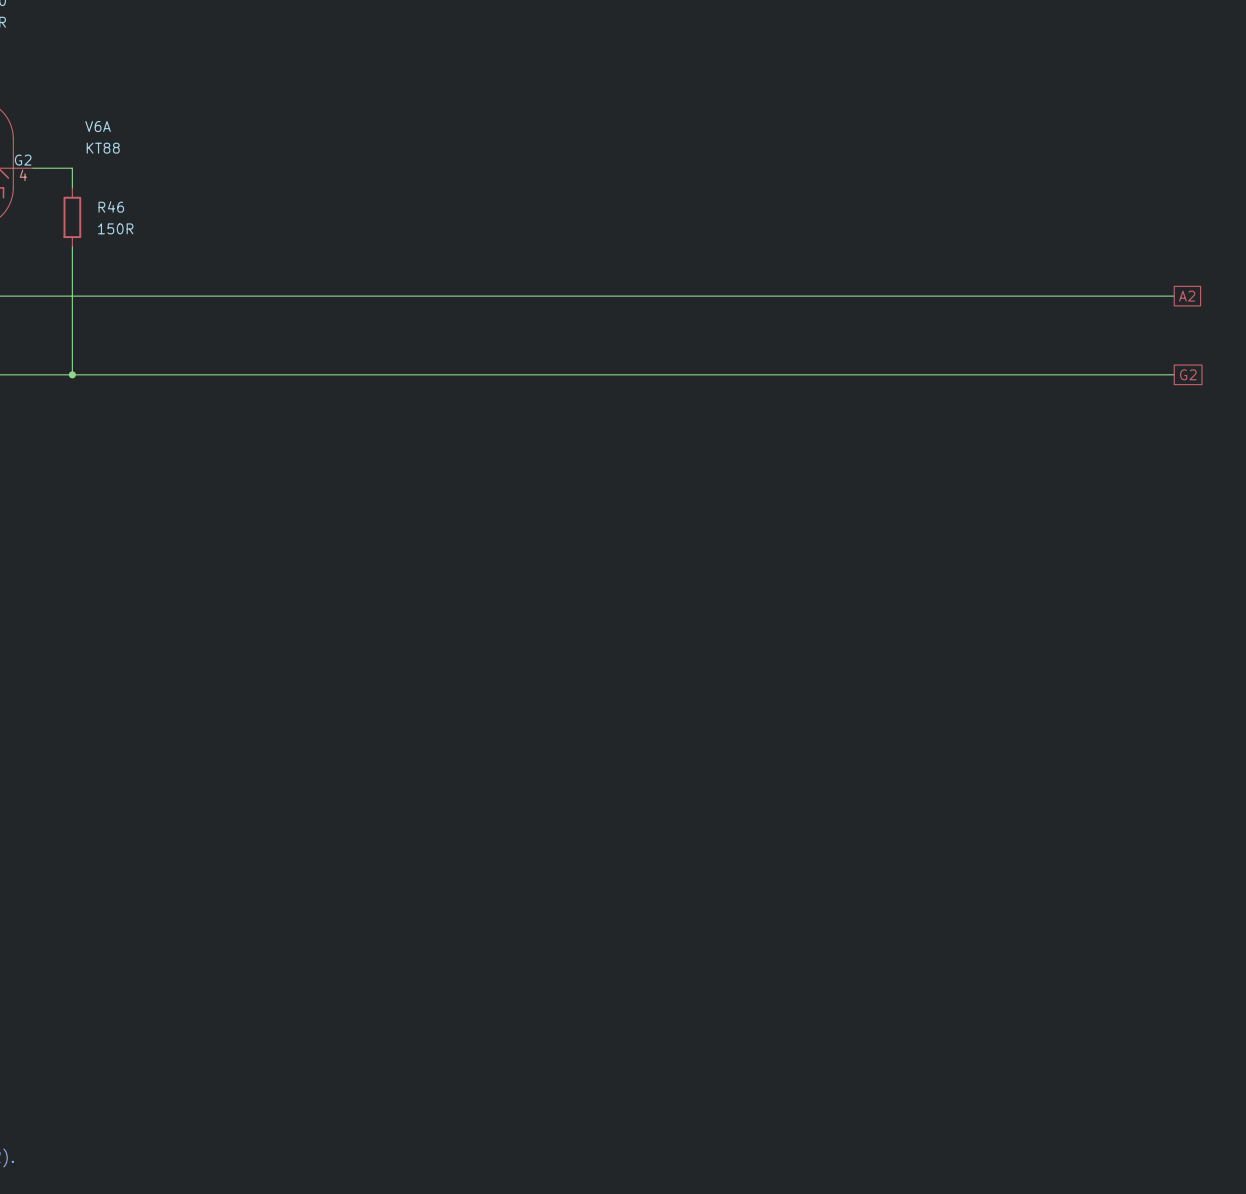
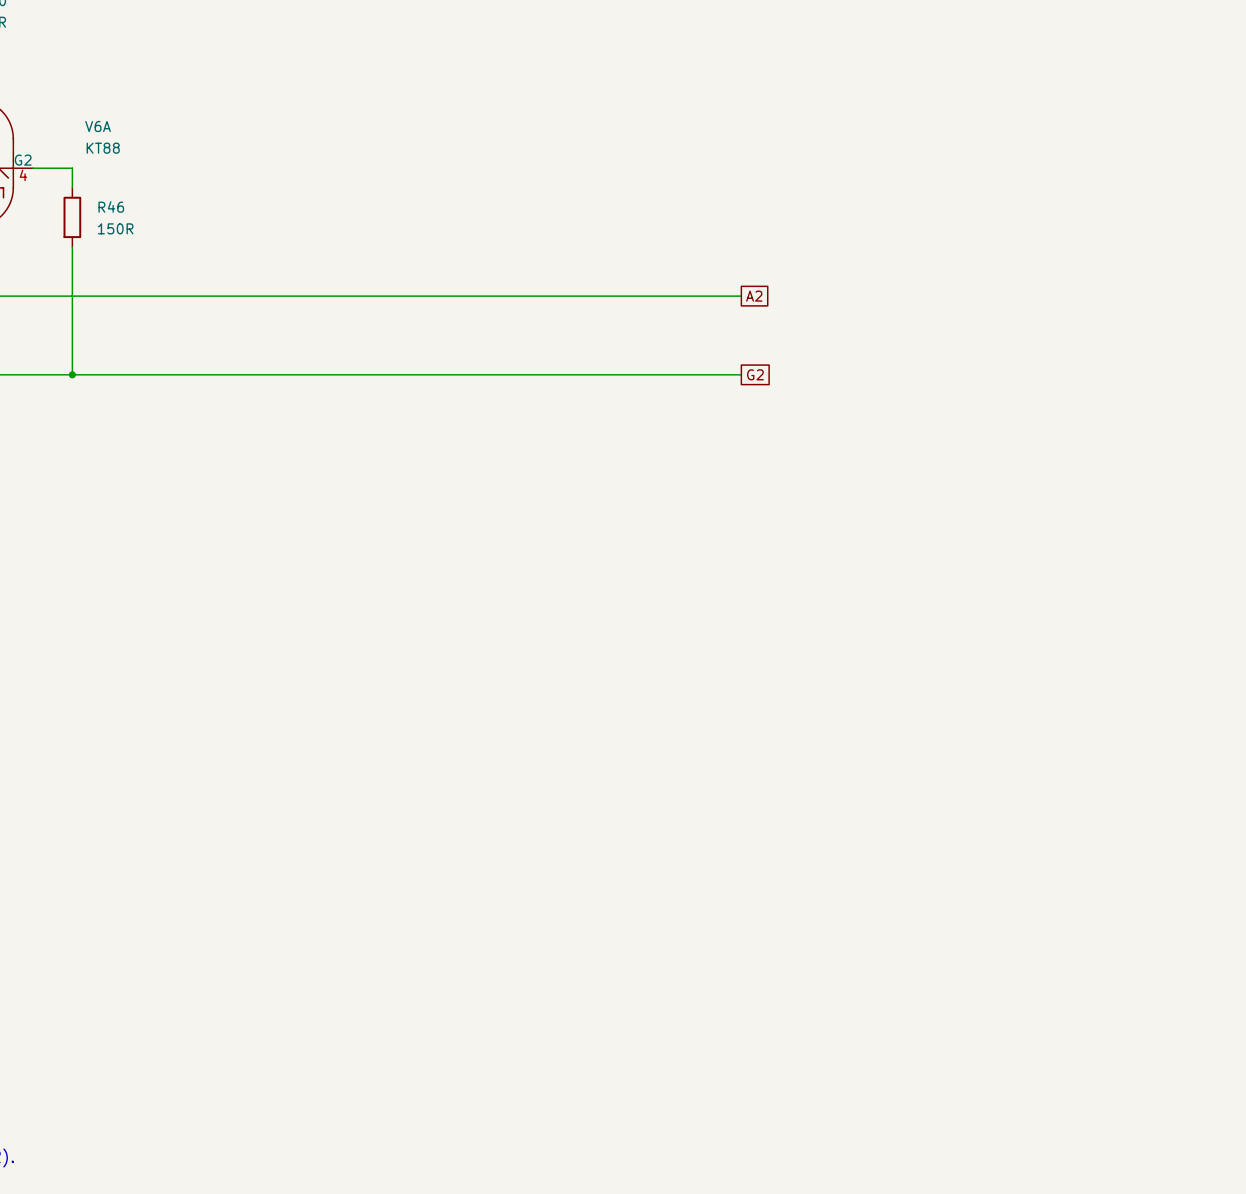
wire: (741, 296) (1174, 296) -> none
global label: none -> A2 (754, 296)
global label: A2 (1187, 296) -> none
wire: (741, 374) (1174, 374) -> none
global label: none -> G2 (755, 374)
global label: G2 (1188, 374) -> none

